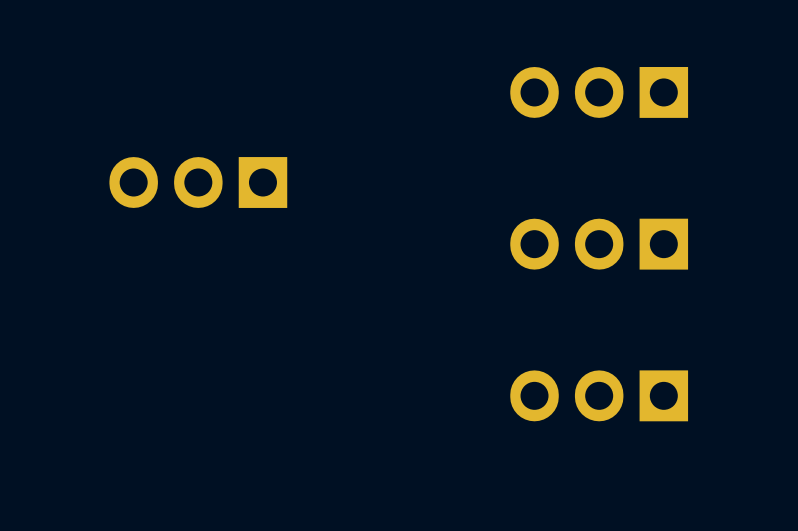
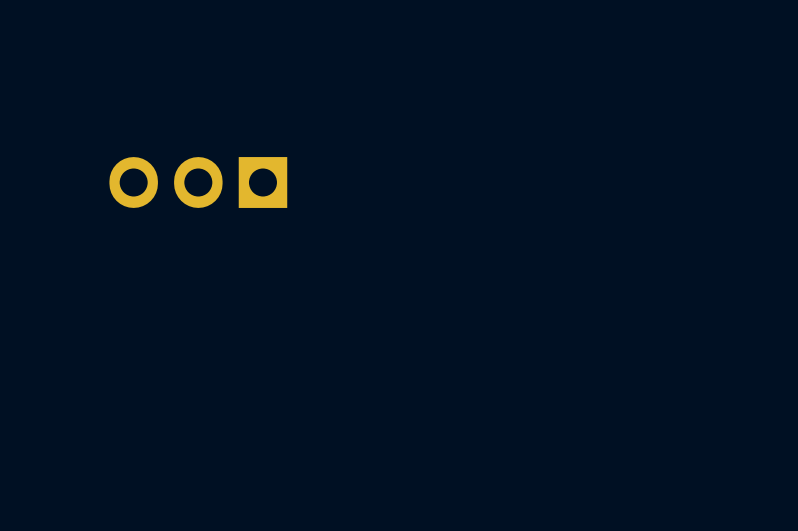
part: (599, 92) -> none
part: (599, 244) -> none
part: (599, 395) -> none

